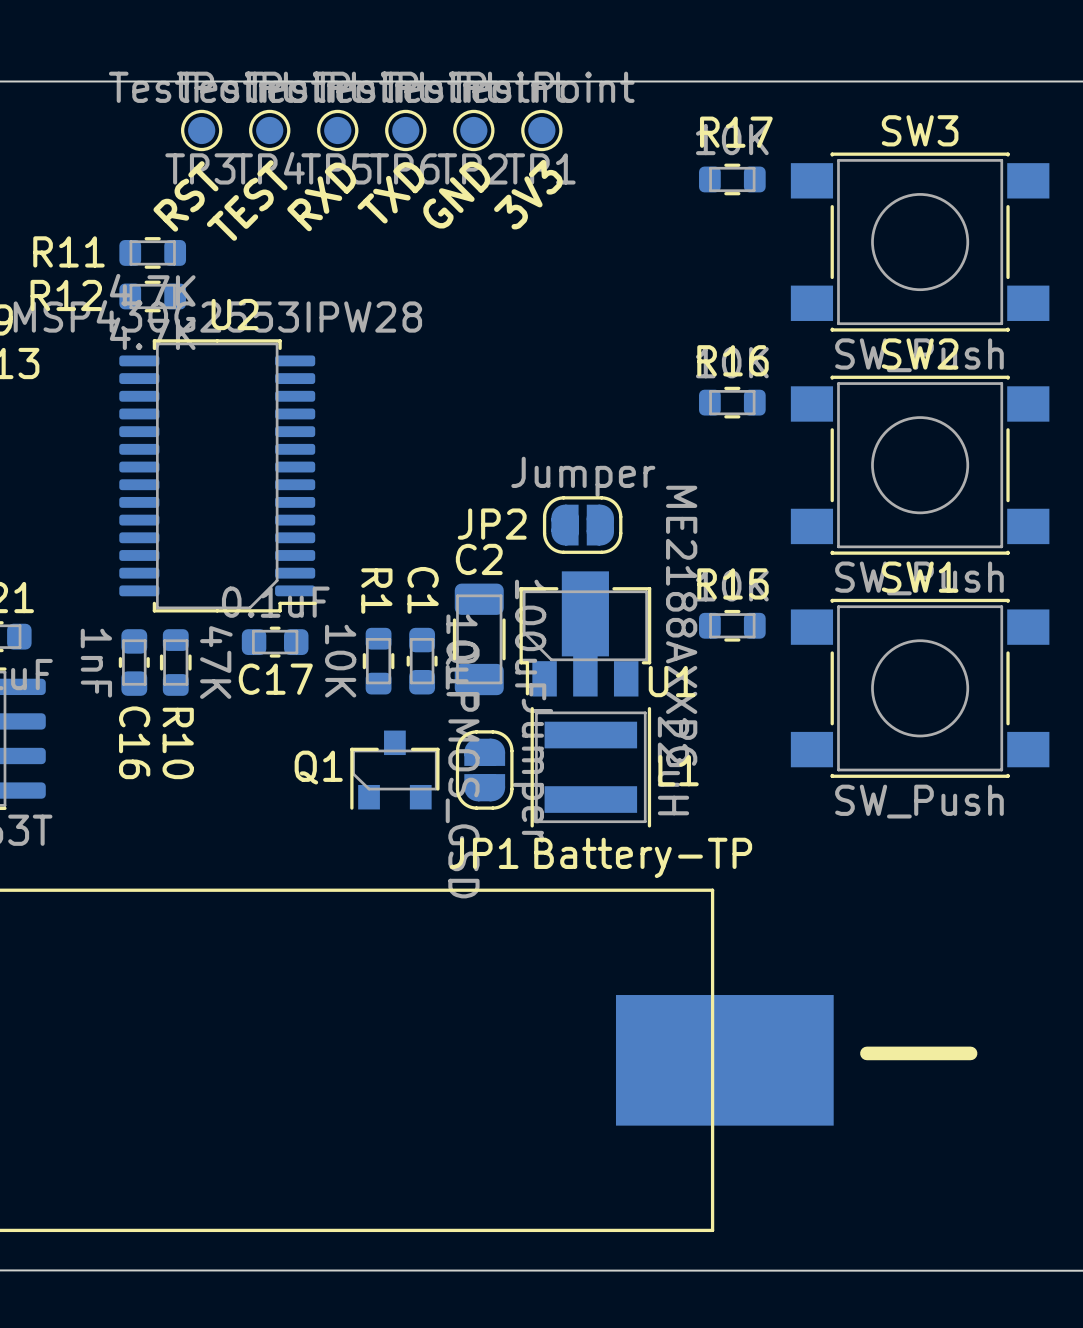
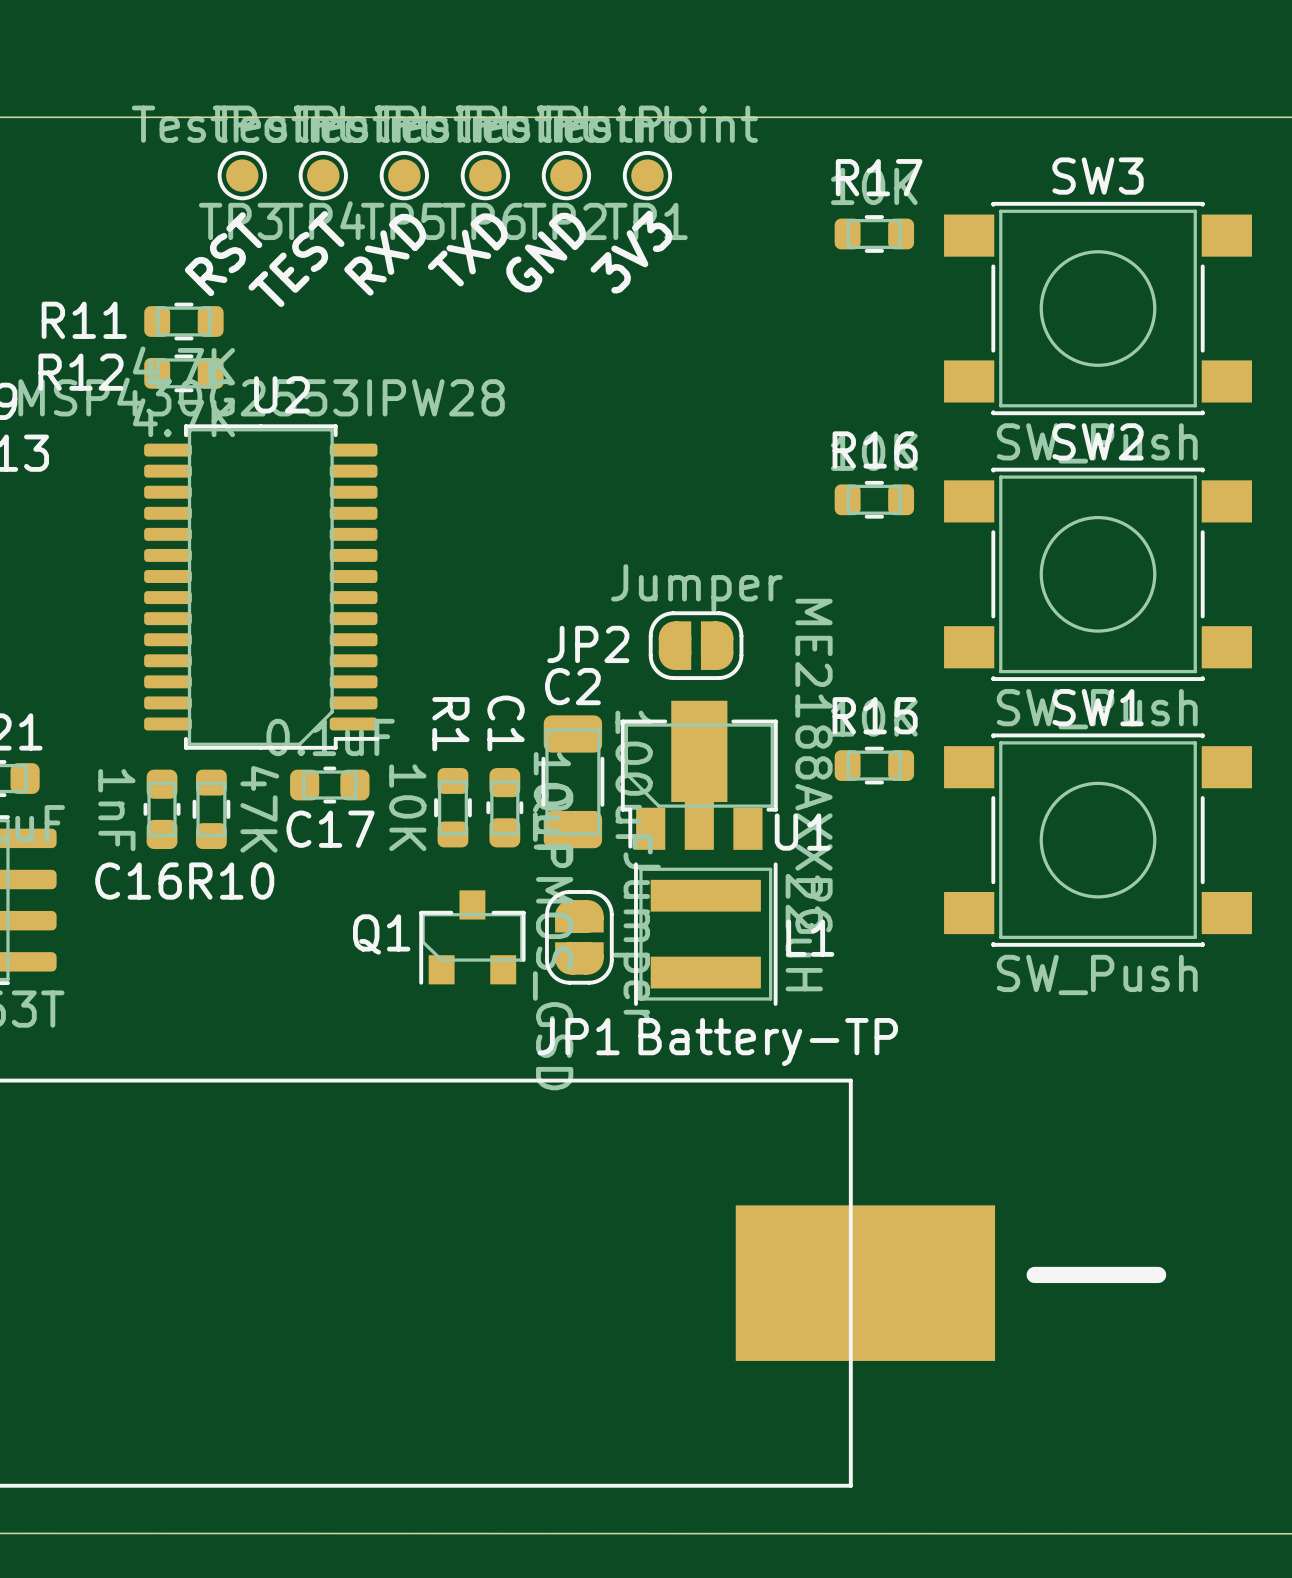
C16 name rotation: 0° (134, 742) -> 90° counterclockwise (138, 881)
R10 name rotation: 0° (178, 743) -> 90° counterclockwise (231, 881)

